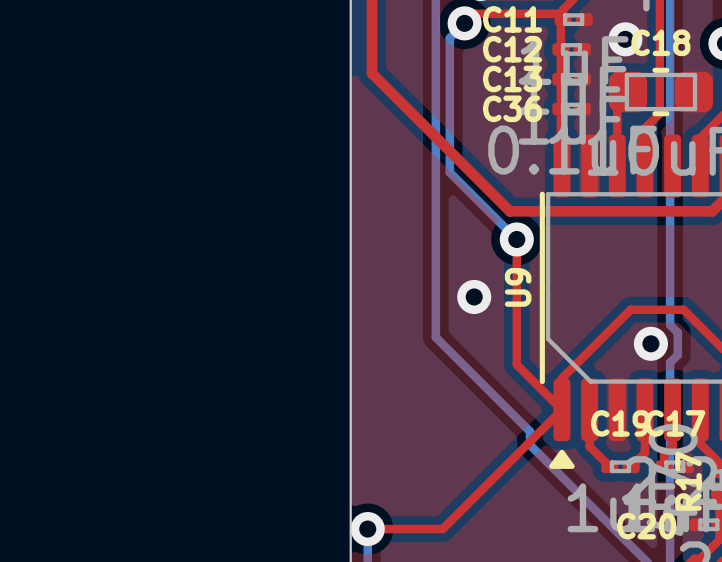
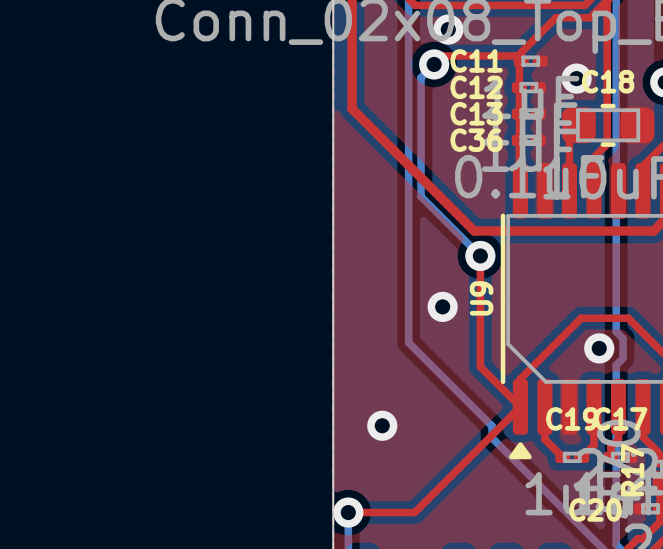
via: none -> (382, 425)

